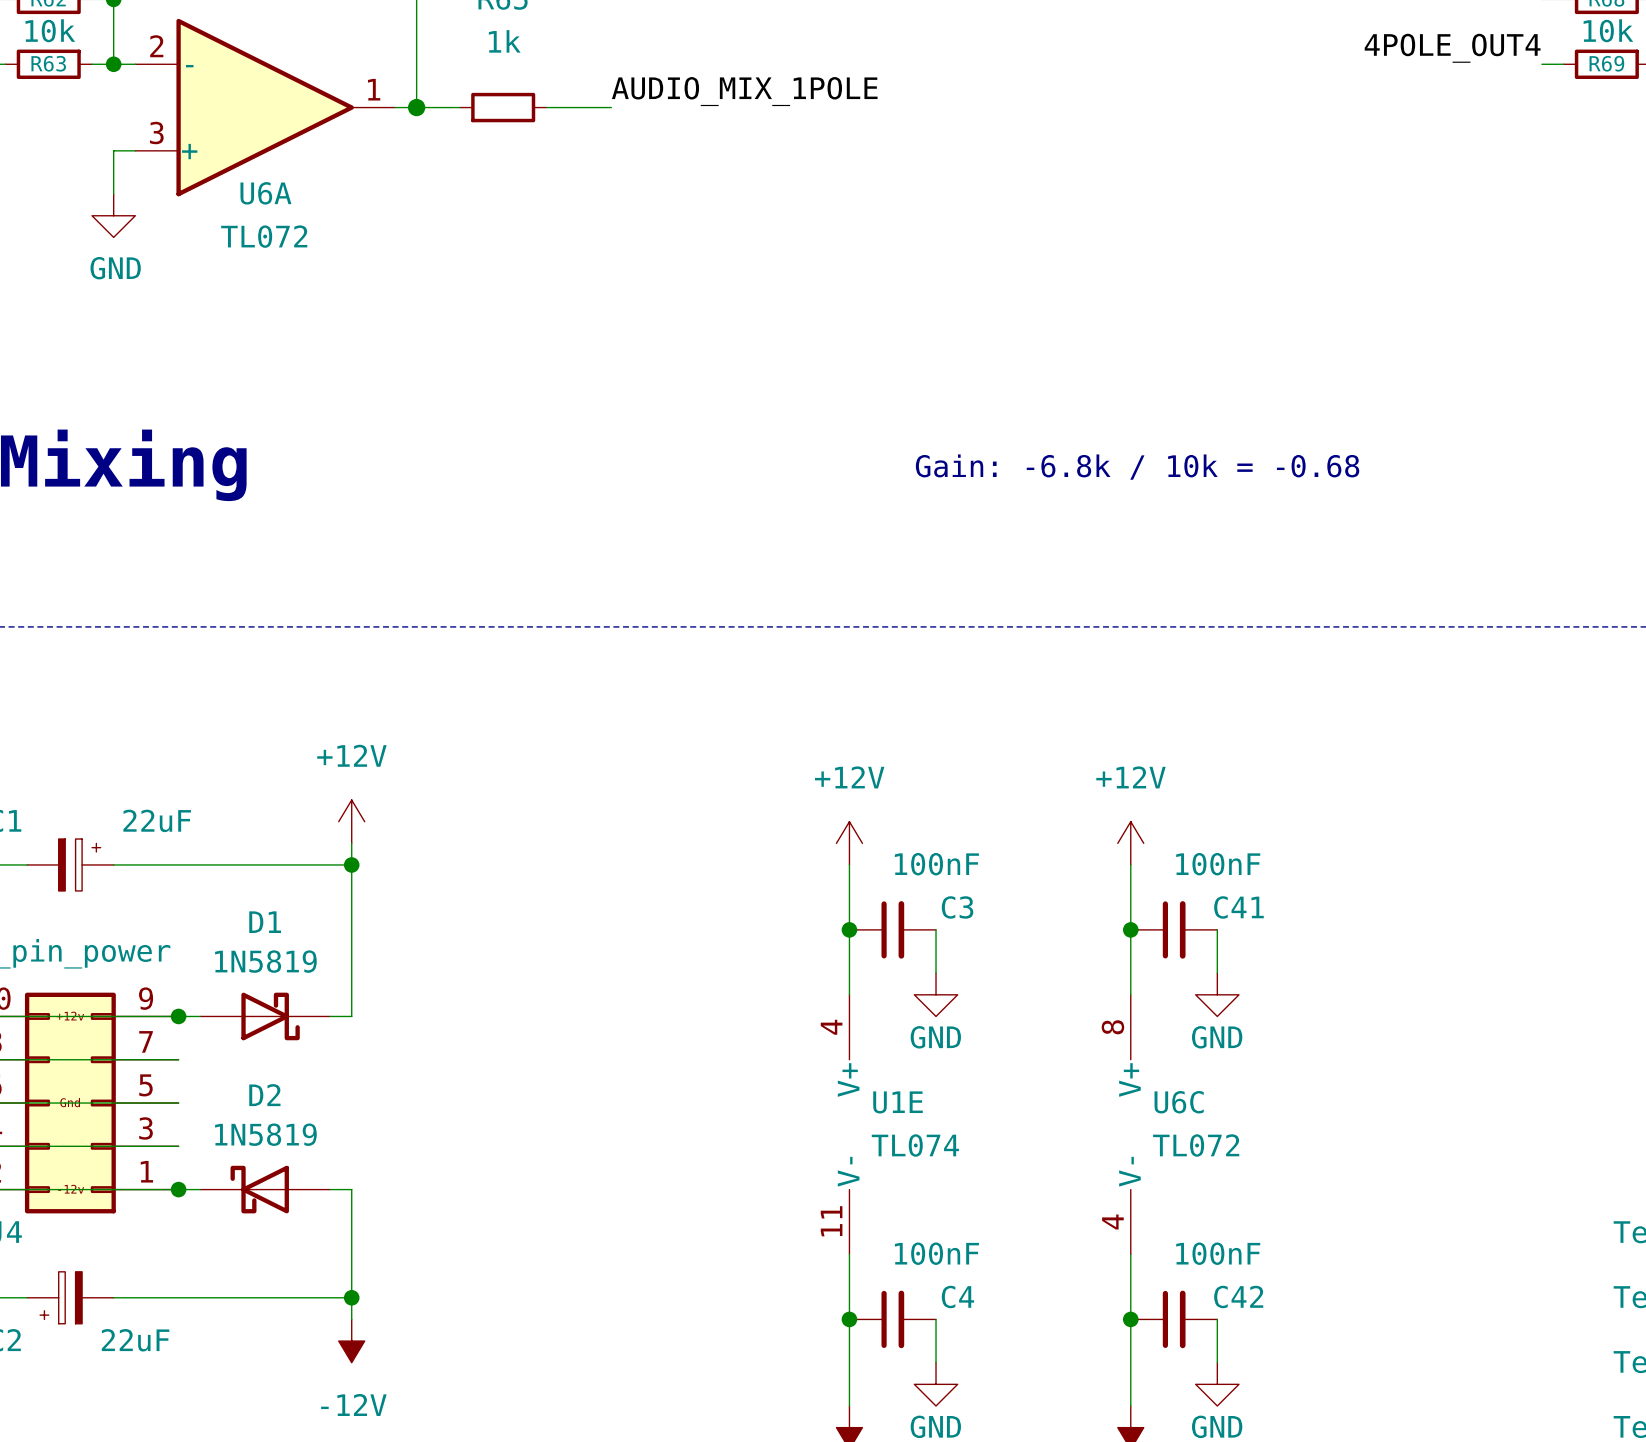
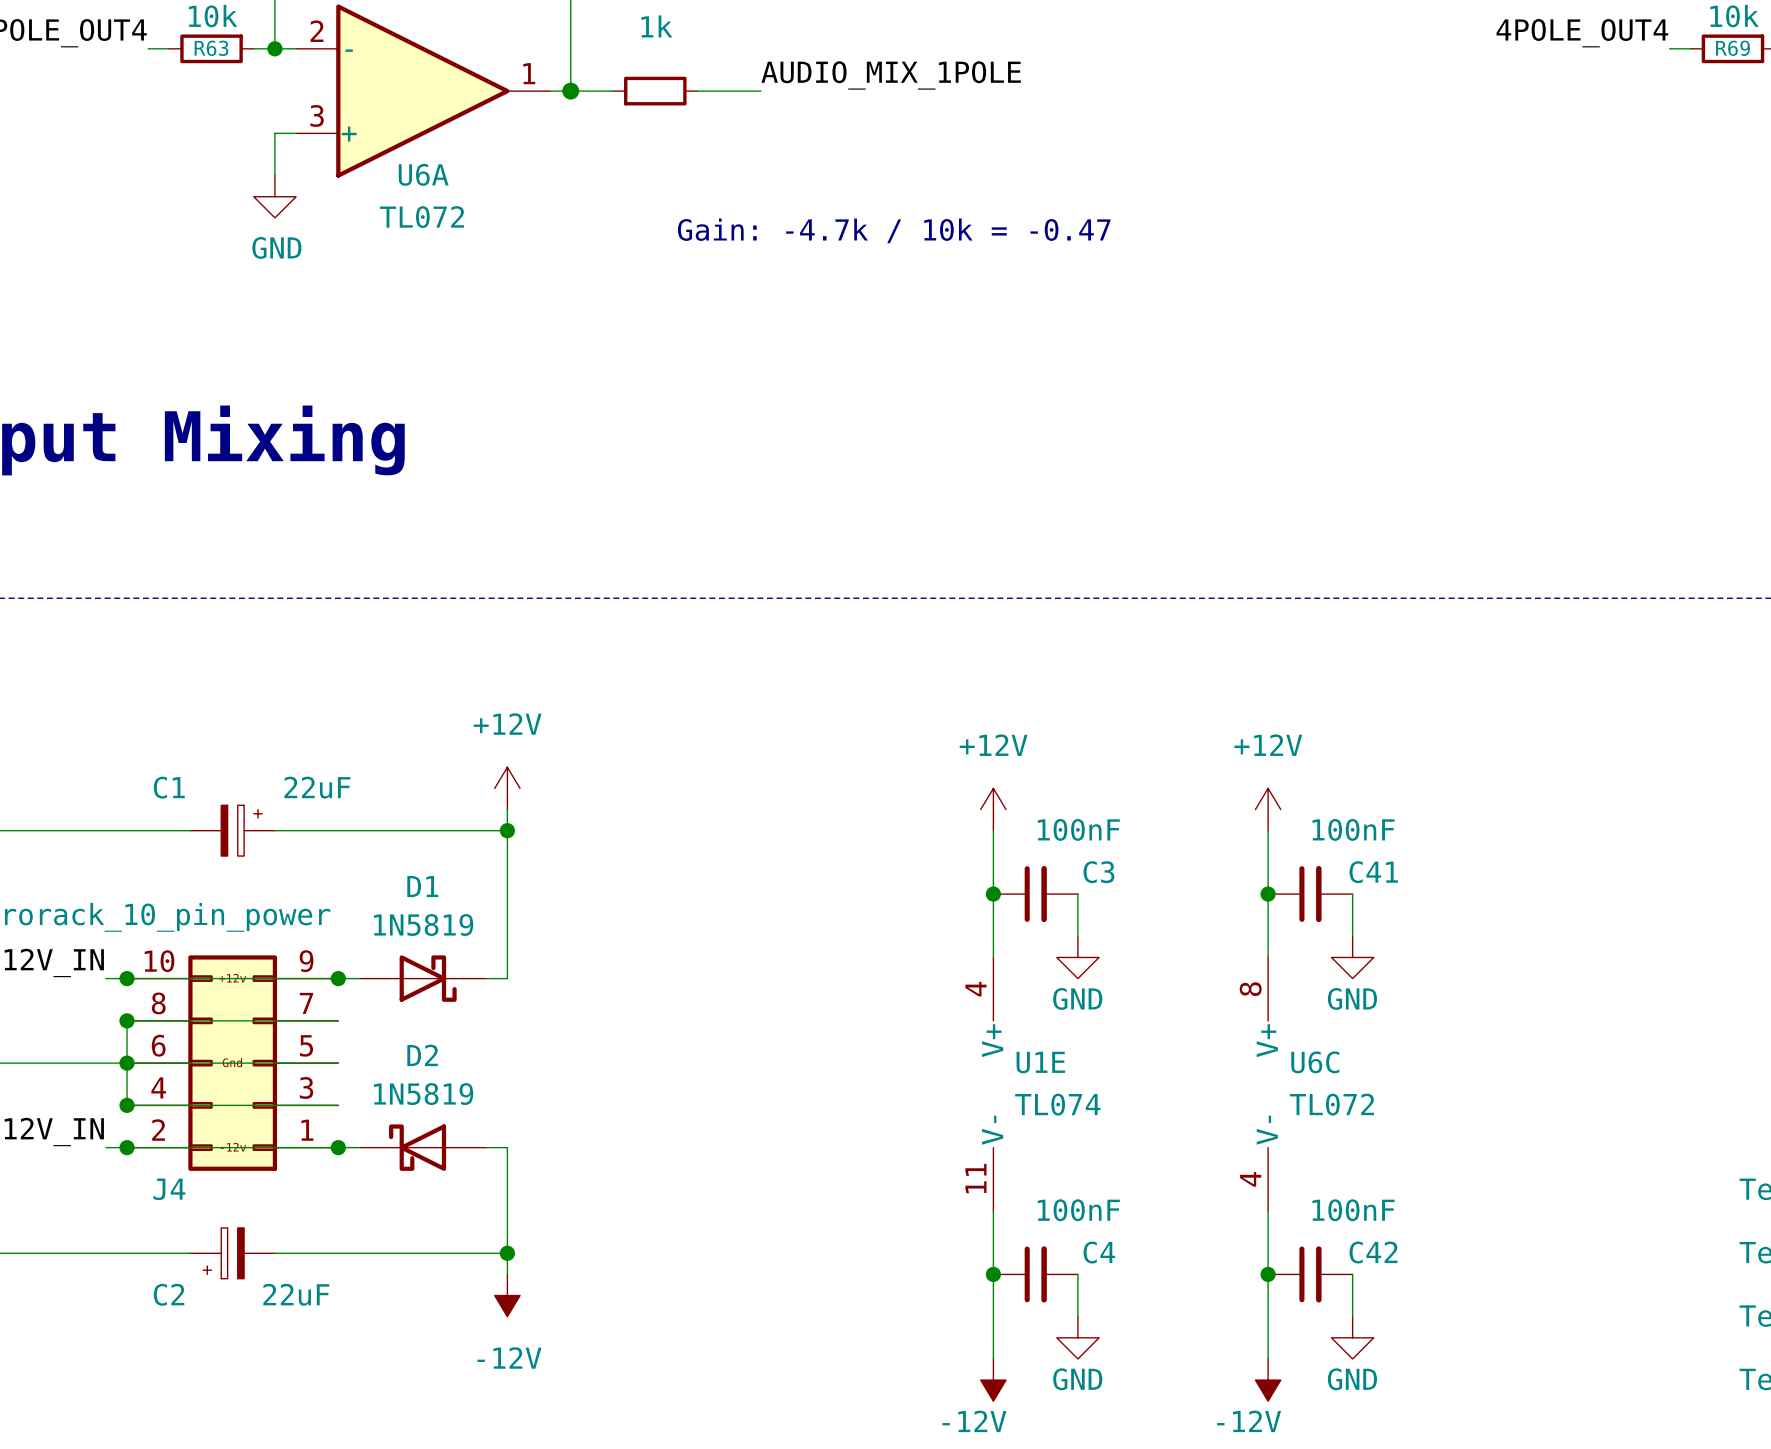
text: none -> Gain: -4.7k / 10k = -0.47 (894, 230)
text: Gain: -6.8k / 10k = -0.68 (1137, 467) -> none

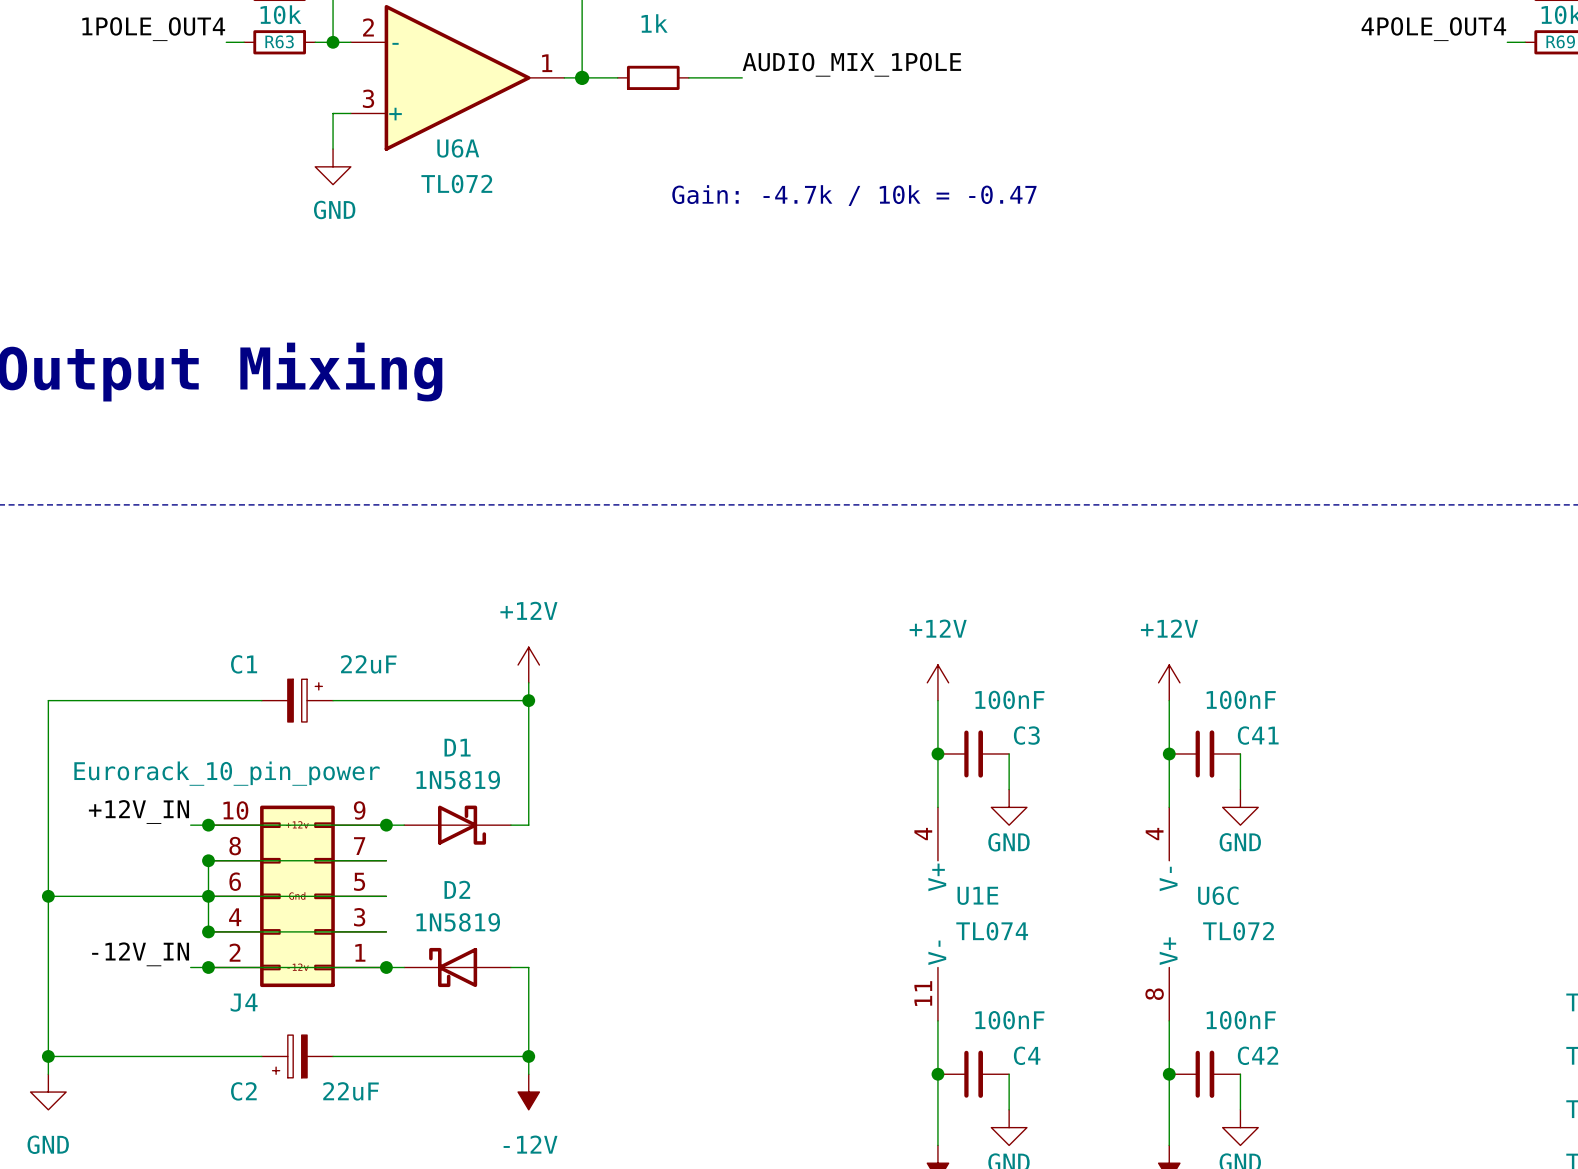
U6C rotation: 0° (1268, 1084) -> 180° (1169, 914)

